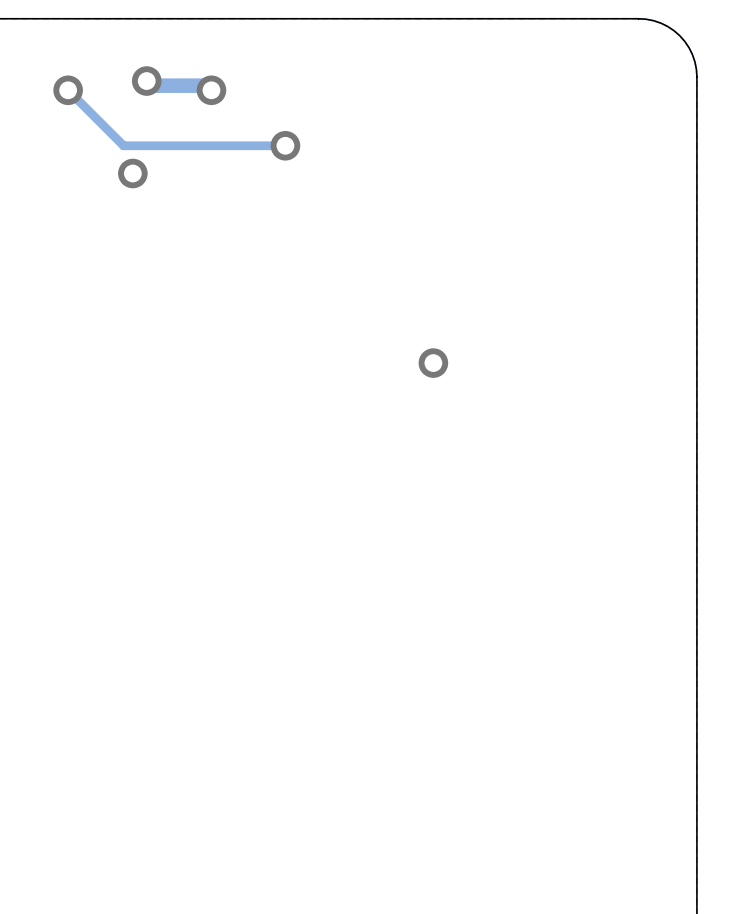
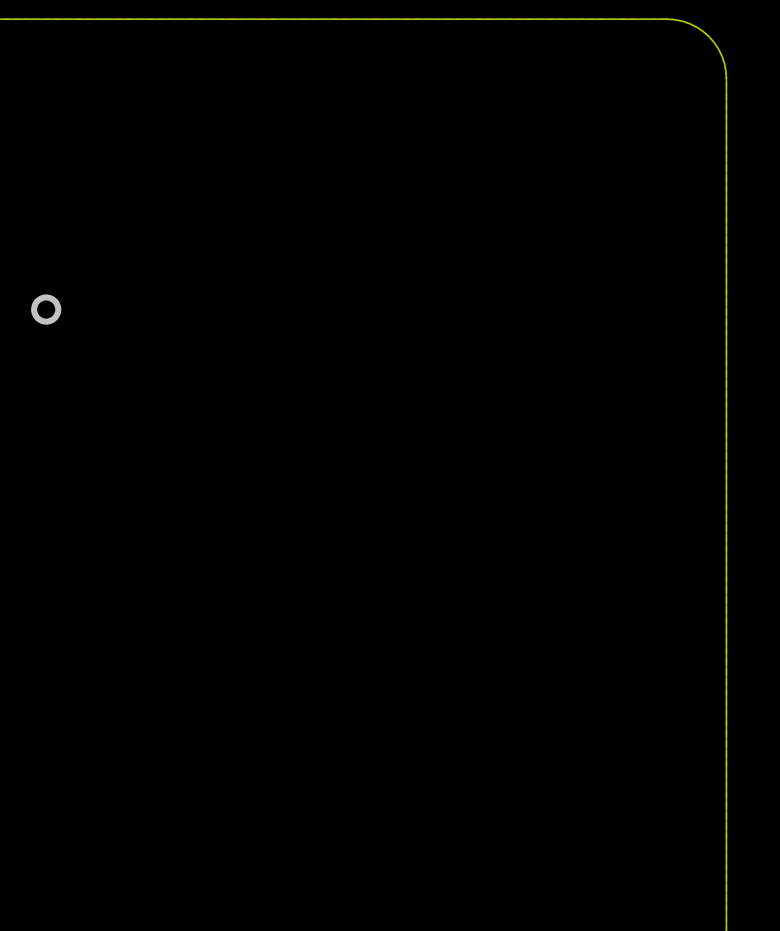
track: (146, 81) (151, 85) (211, 85) (211, 90) -> none
via: (146, 81) -> none
track: (68, 90) (123, 145) (285, 145) -> none
via: (68, 90) -> none
via: (211, 90) -> none
via: (285, 145) -> none
via: (132, 173) -> none
via: none -> (46, 309)
via: (433, 363) -> none

